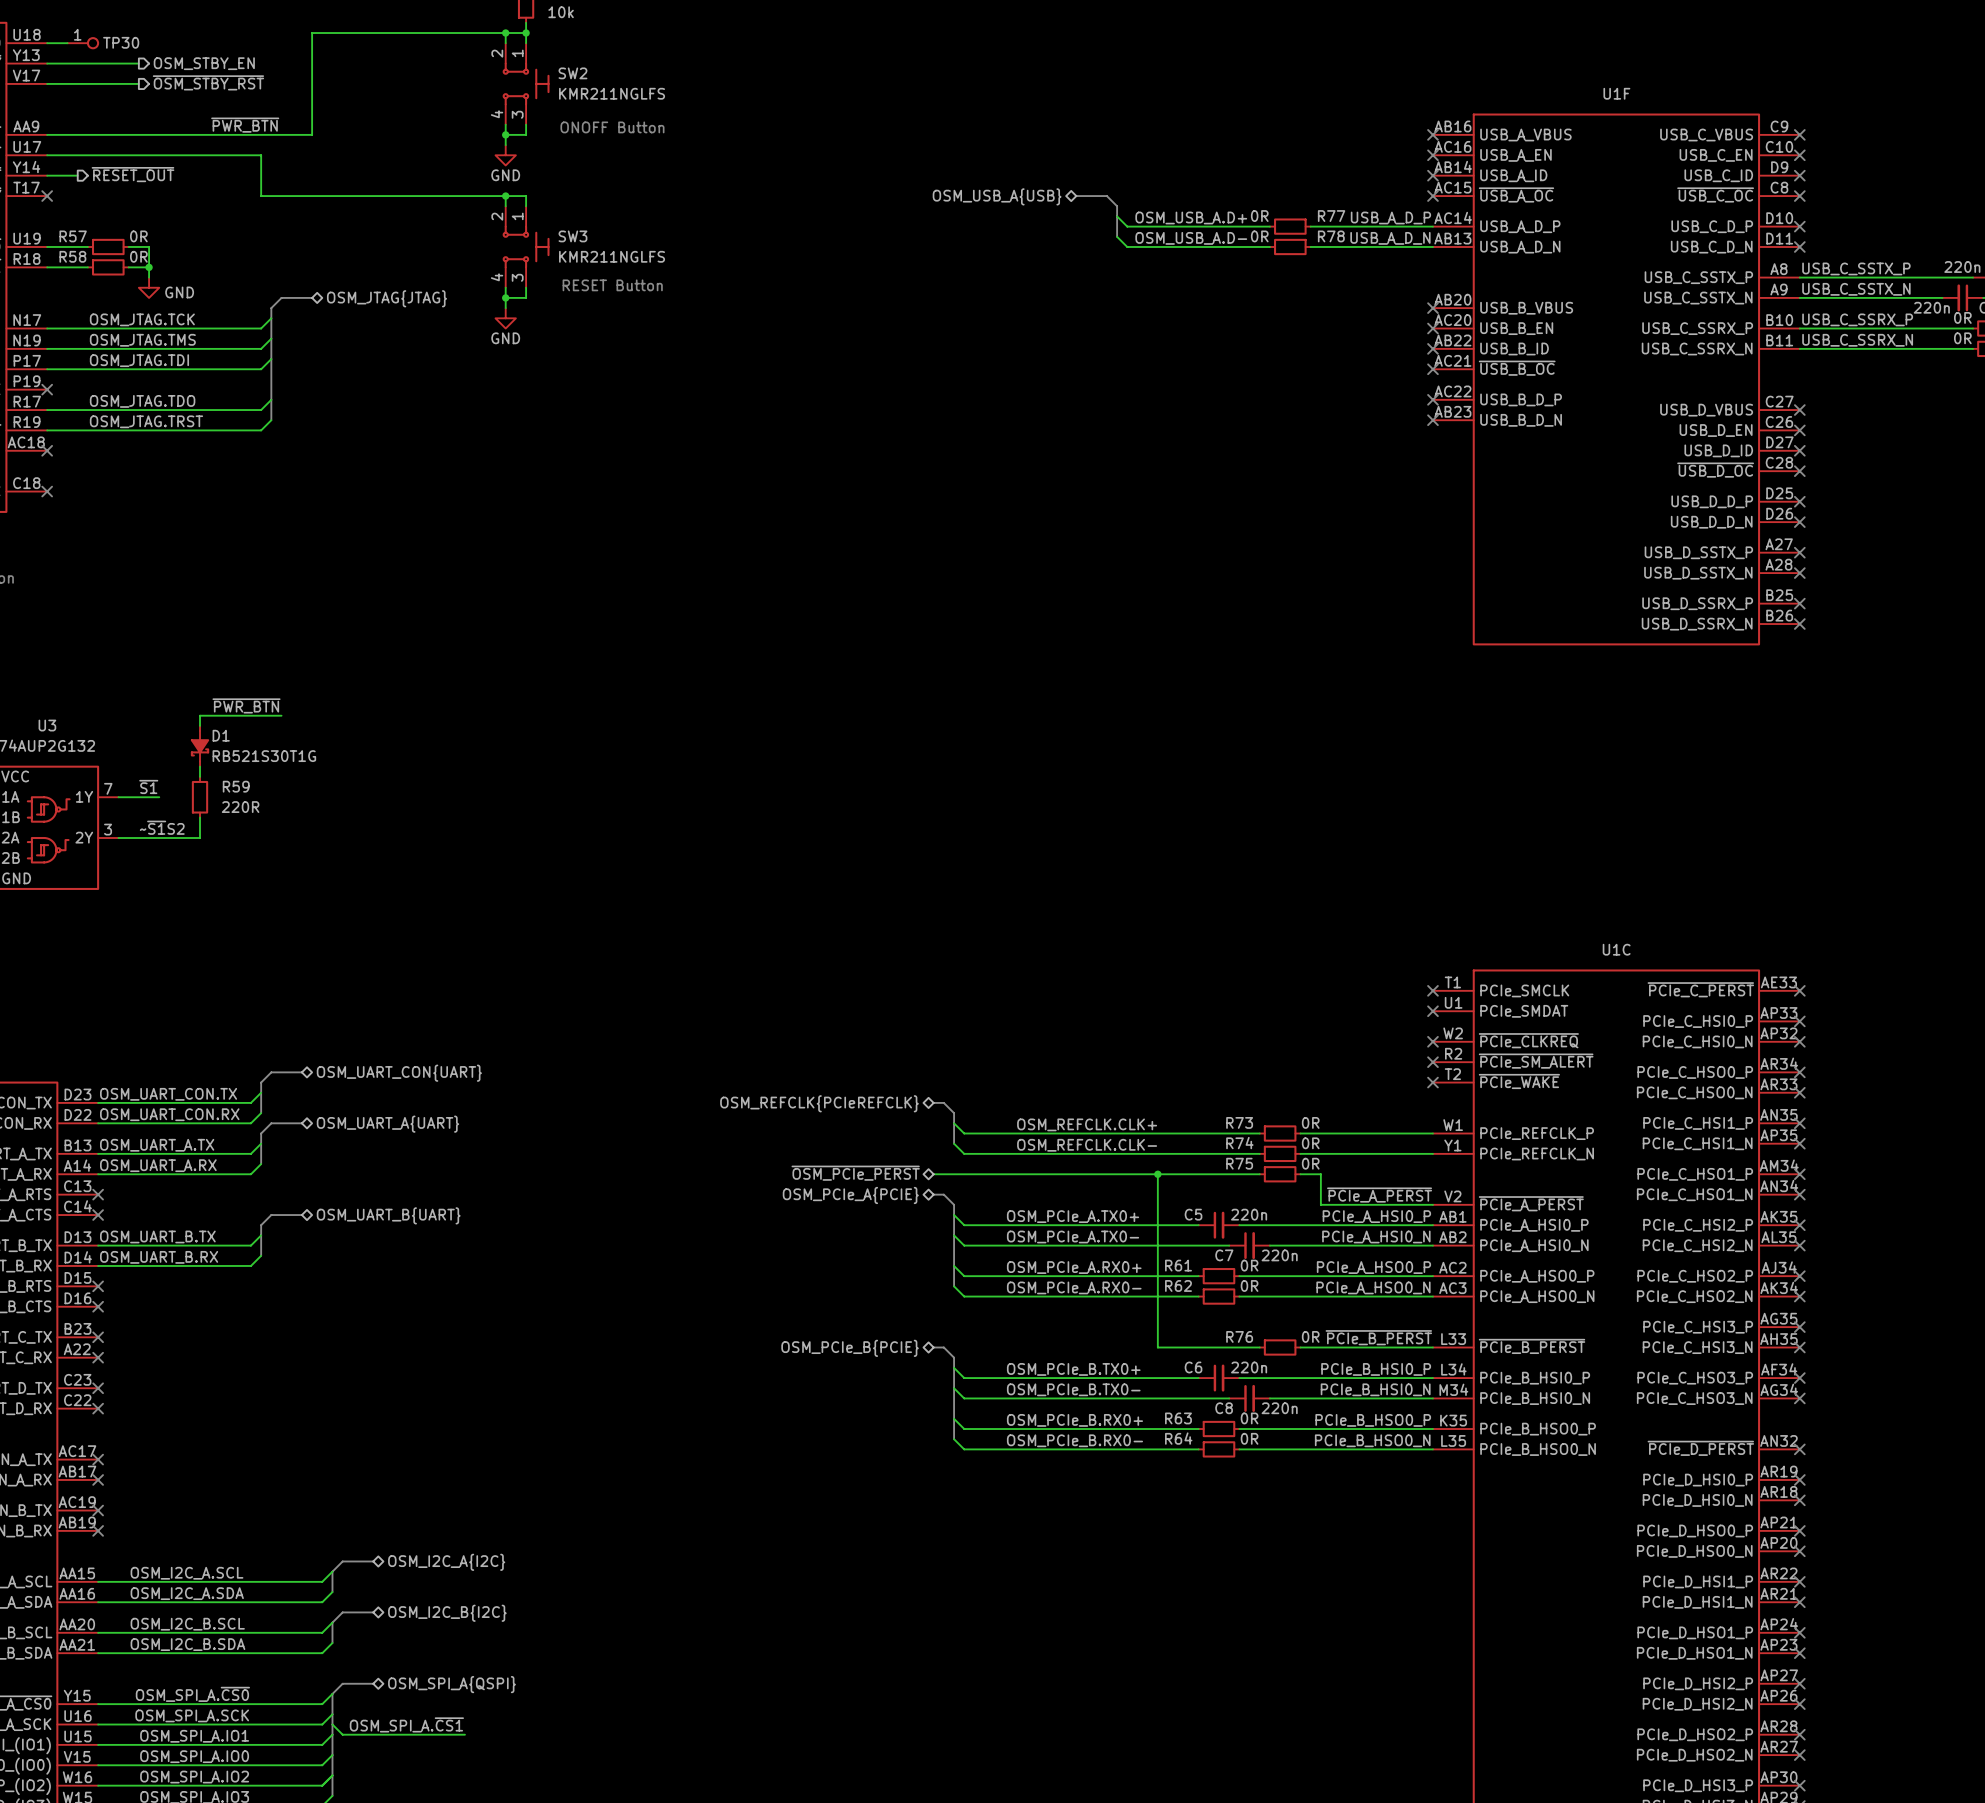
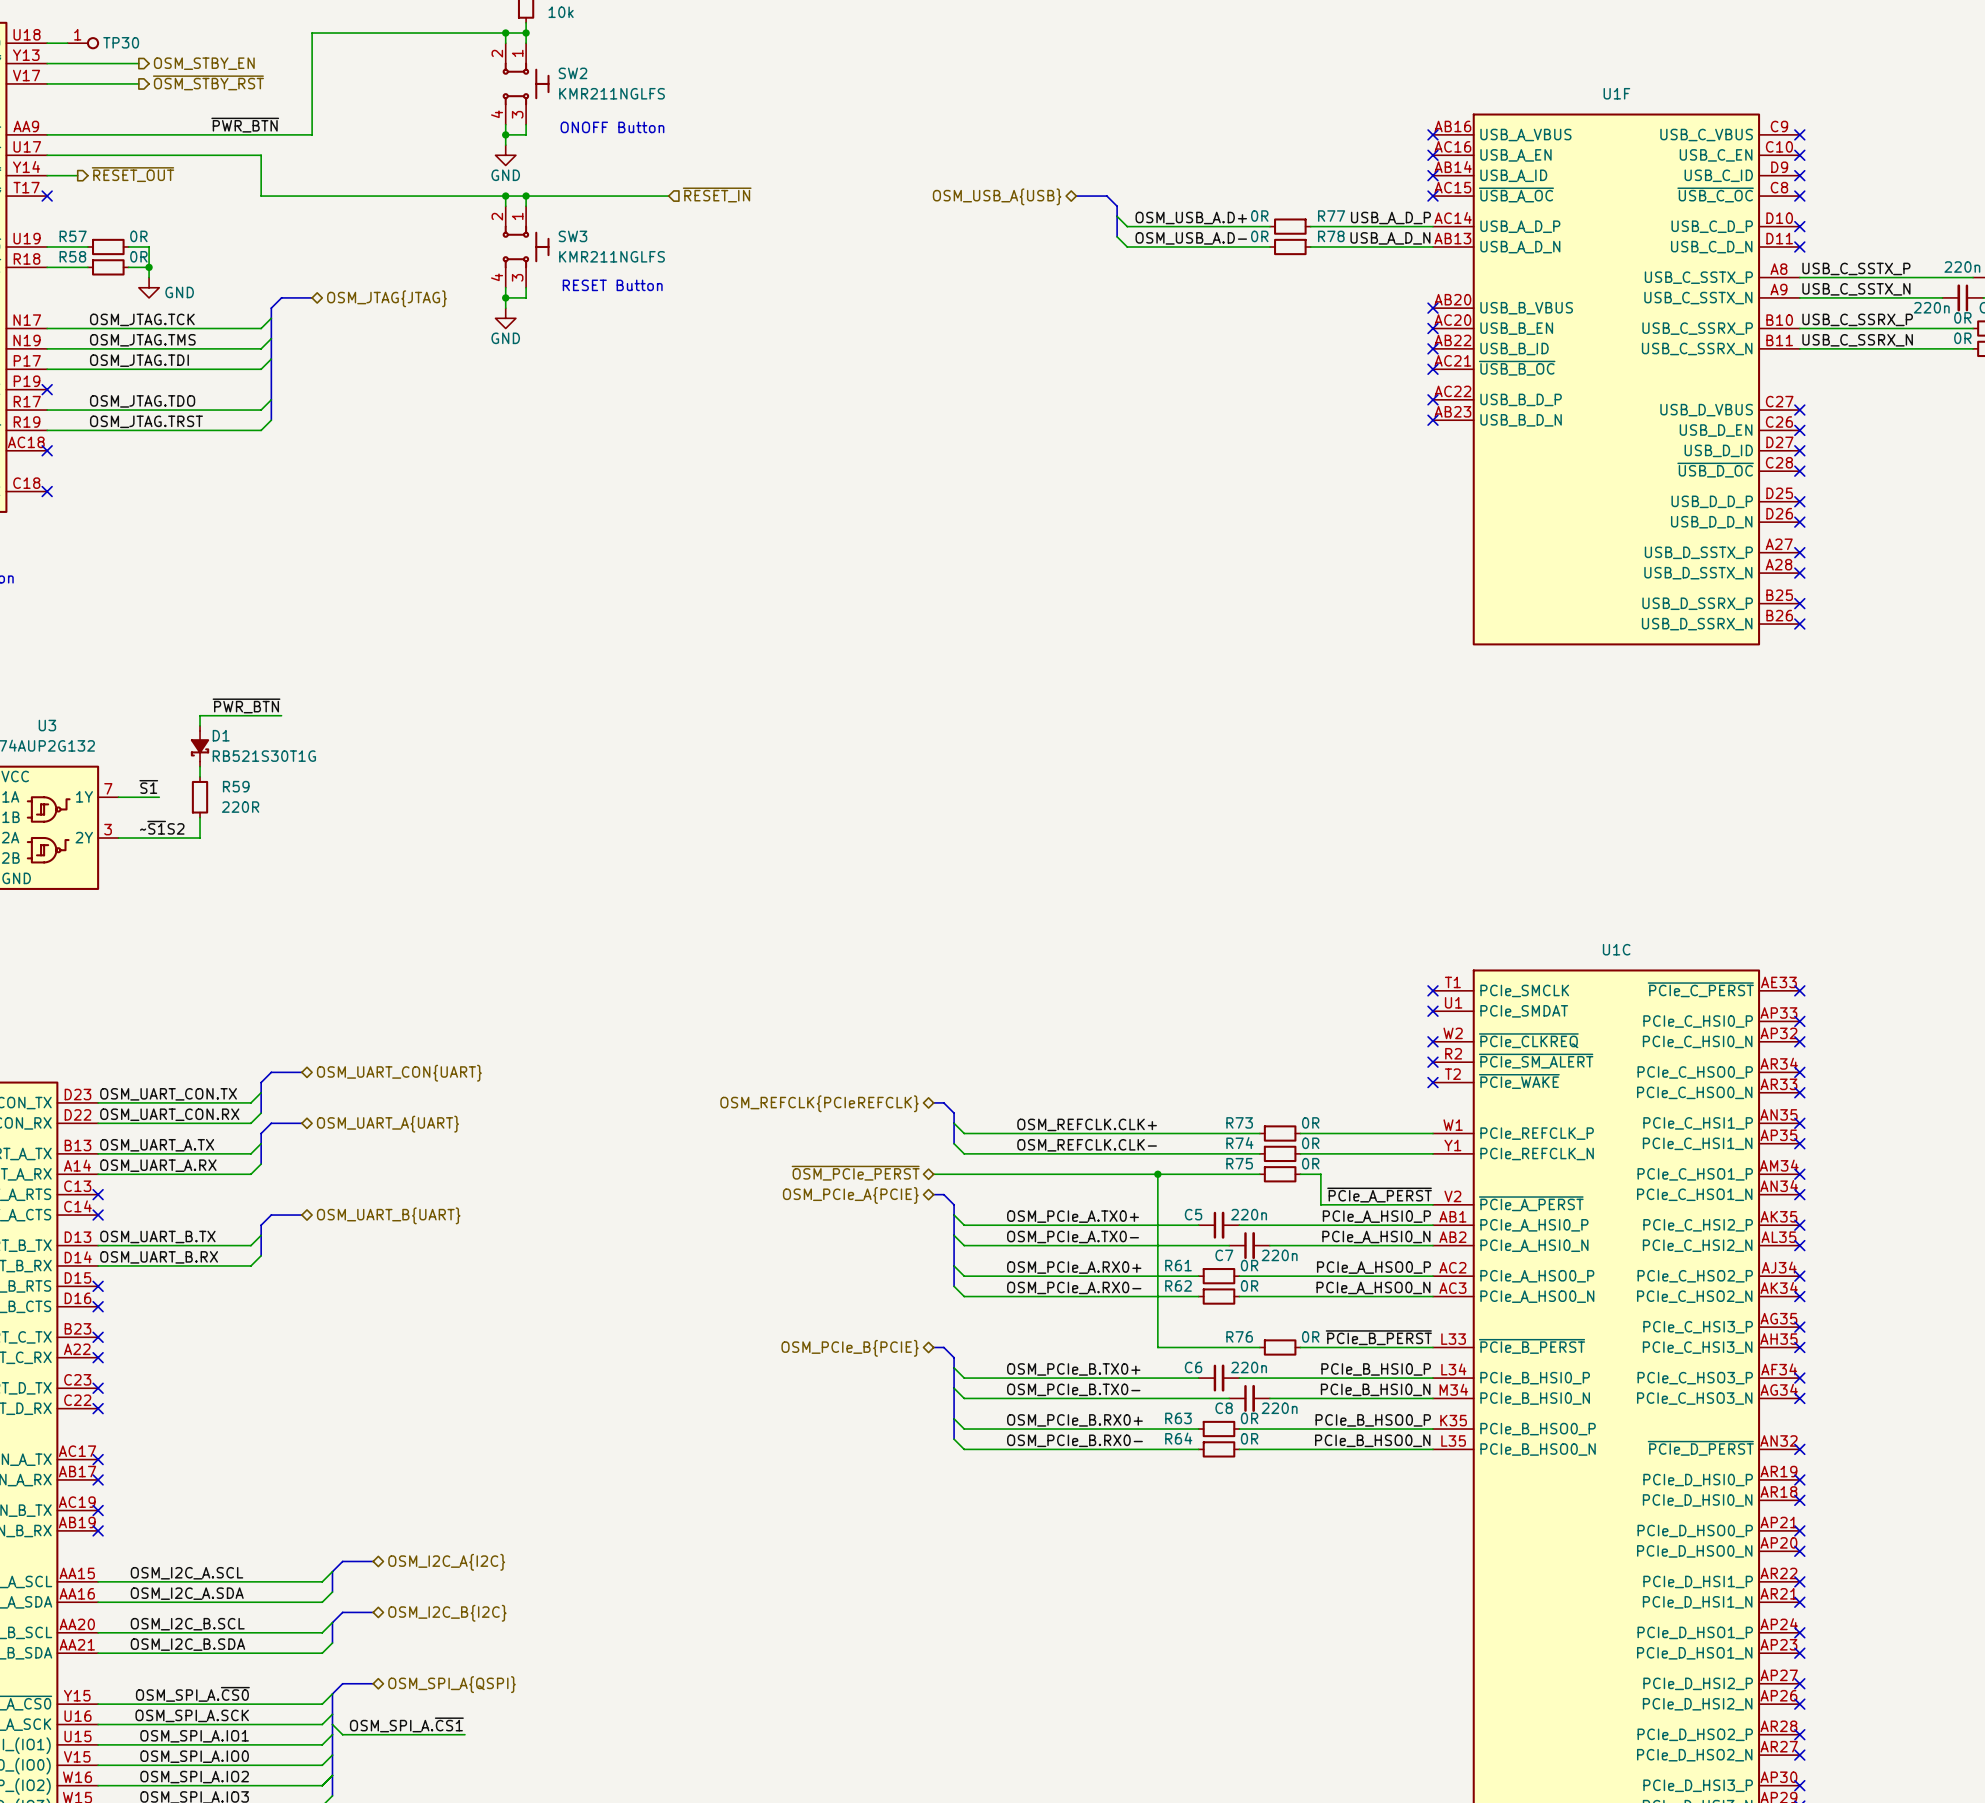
hierarchical label: none -> ~{RESET_IN} (717, 194)
wire: none -> (526, 196) (668, 196)
junction: none -> (526, 196)

